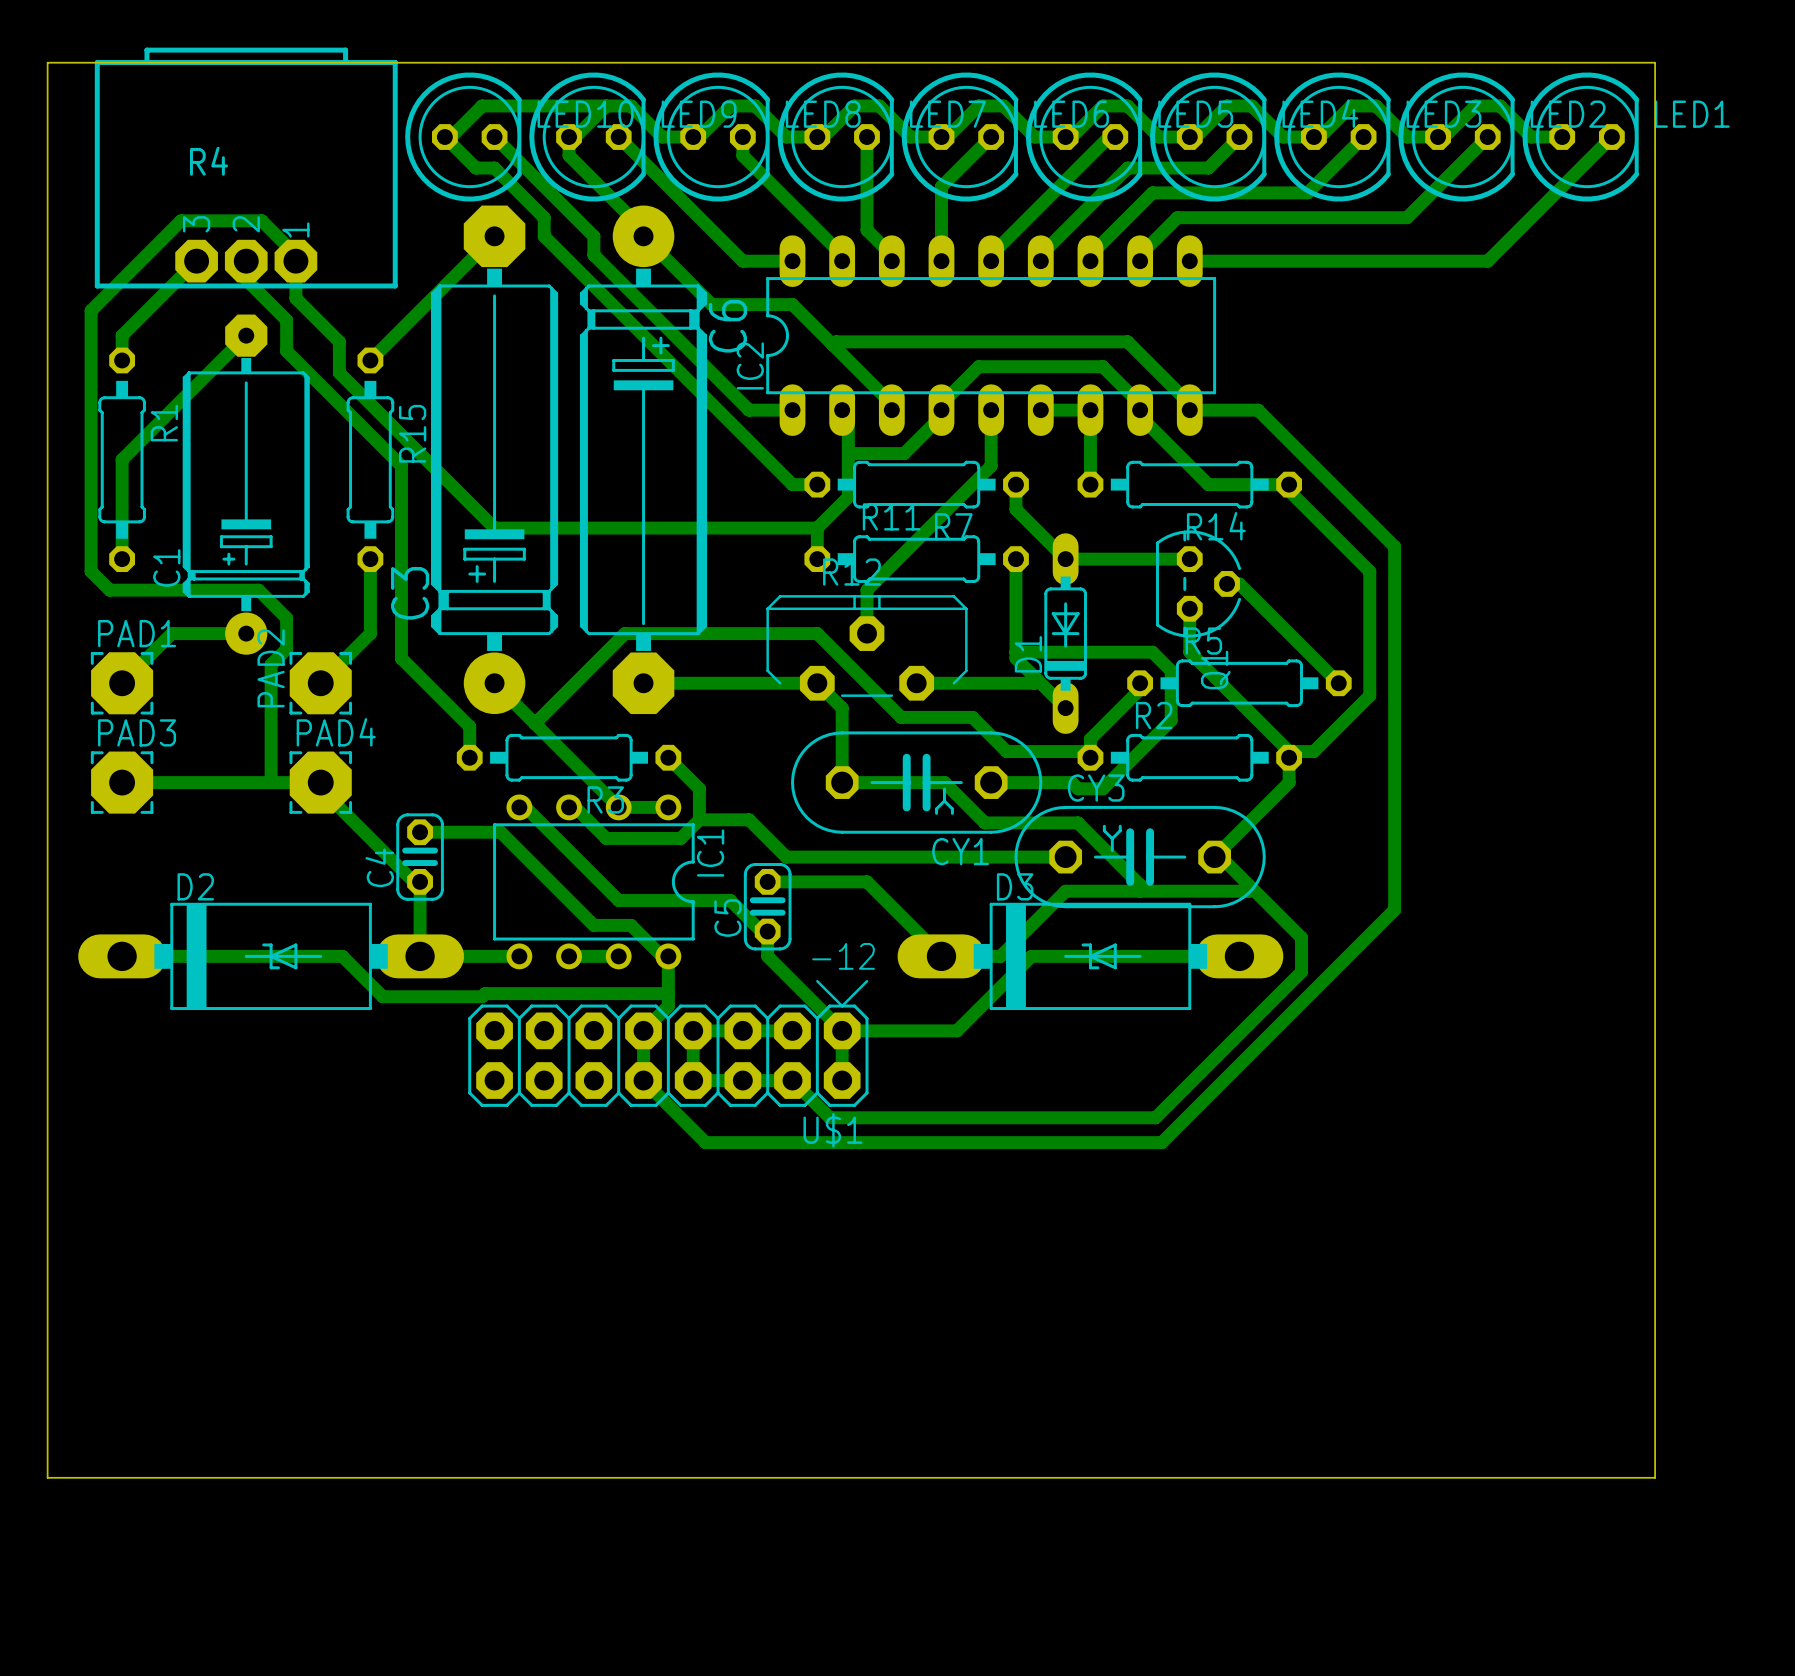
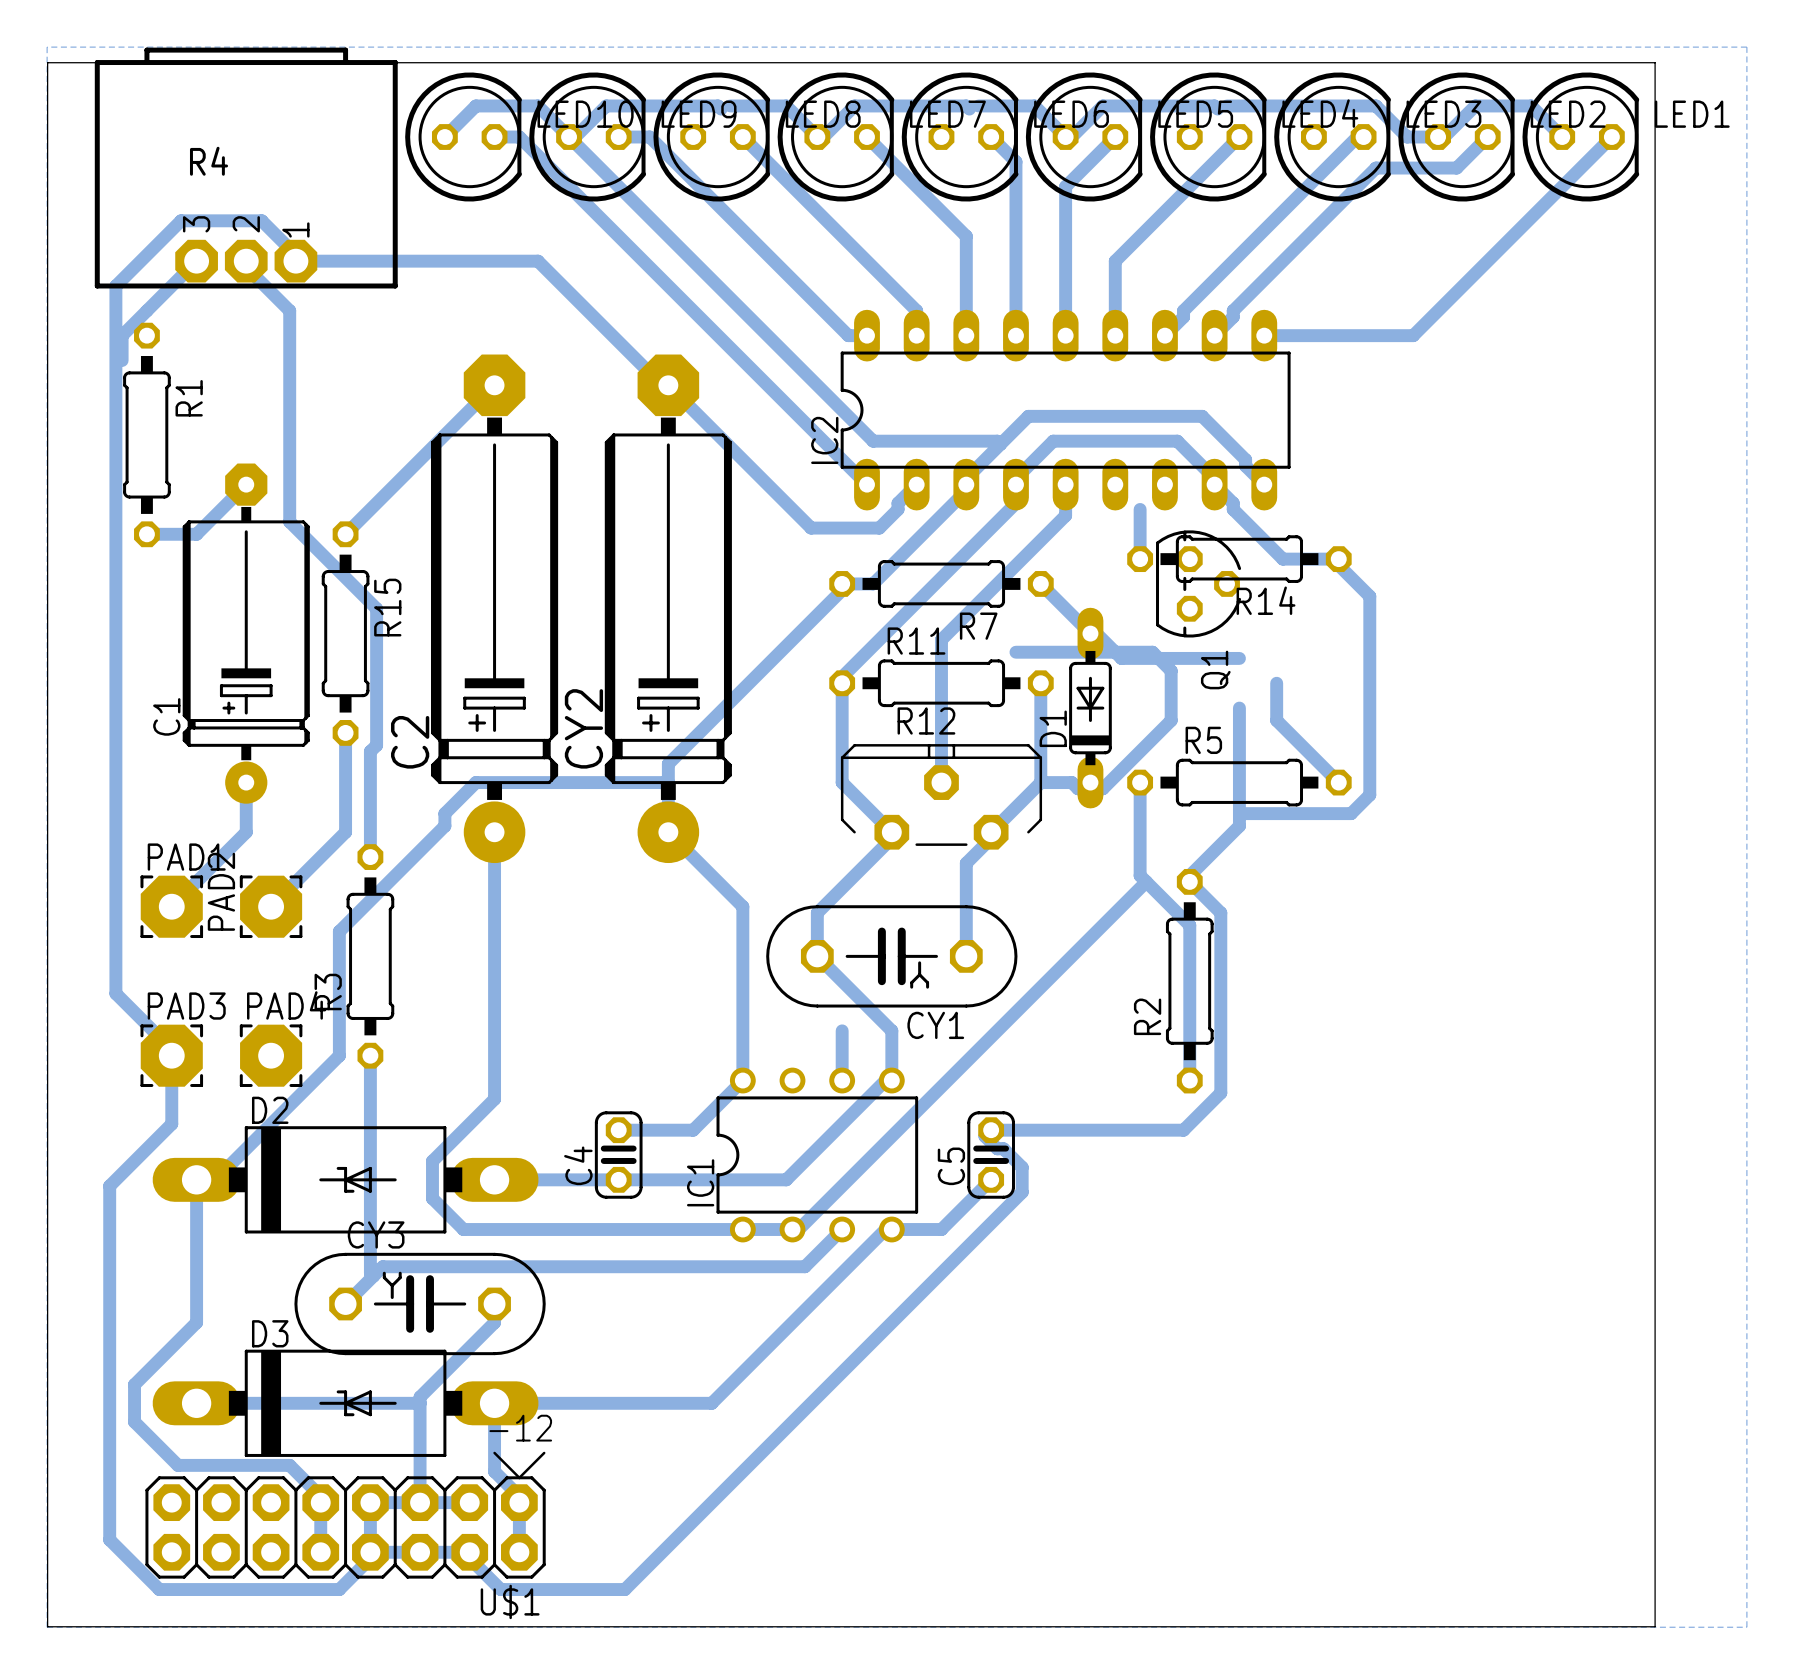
bottom zone outline: none -> (47, 47) (1746, 47) (1746, 1627) (47, 1627) (47, 47)
bottom track: (482, 105) (451, 137) (444, 137) (475, 168) (494, 168) (544, 217) (544, 236) (792, 484) (817, 484) -> (482, 105) (475, 105) (444, 137)
bottom track: (538, 105) (606, 105) -> (538, 105) (842, 410)
bottom track: (631, 105) (662, 137) (699, 137) (730, 105) -> (631, 105) (718, 105) (721, 109)
bottom track: (755, 105) (786, 137) (817, 137) -> (755, 105) (786, 105) (817, 137)
bottom track: (879, 105) (910, 137) (947, 137) (978, 105) -> (879, 105) (966, 105) (969, 109)
bottom track: (1003, 105) (1034, 137) (1065, 137) -> (1003, 105) (1034, 105) (1065, 137)
bottom track: (1127, 105) (1158, 137) (1195, 137) (1227, 105) -> (1127, 105) (1214, 105) (1217, 109)
bottom track: (1251, 105) (1282, 137) (1320, 137) (1351, 105) -> (1251, 105) (1351, 105)
bottom track: (1500, 105) (1531, 137) (1562, 137) -> (1500, 105) (1531, 105) (1562, 137)
bottom track: (494, 137) (593, 236) (593, 254) (749, 410) (792, 410) -> (494, 137) (519, 137) (866, 484)
bottom track: (569, 137) (569, 155) (643, 230) (643, 236) (711, 304) (792, 304) (891, 403) (891, 410) -> none
bottom track: (618, 137) (742, 261) (792, 261) -> (618, 137) (649, 137) (848, 335) (866, 335)
bottom track: (742, 137) (742, 155) (842, 254) (842, 261) -> (742, 137) (916, 310) (916, 335)
bottom track: (866, 137) (866, 230) (891, 254) (891, 261) -> (866, 137) (966, 236) (966, 335)
bottom track: (991, 137) (941, 186) (941, 261) -> (991, 137) (1015, 161) (1015, 335)
bottom track: (1115, 137) (1109, 137) (991, 254) (991, 261) -> (1115, 137) (1065, 186) (1065, 335)
bottom track: (1363, 137) (1307, 192) (1152, 192) (1090, 254) (1090, 261) -> (1363, 137) (1357, 137) (1183, 310) (1183, 317) (1164, 335)
bottom track: (1208, 168) (1127, 168) (1040, 254) (1040, 261) -> (1208, 168) (1115, 261) (1115, 335)
bottom track: (1456, 168) (1407, 217) (1177, 217) (1140, 254) (1140, 261) -> (1456, 168) (1376, 168) (1233, 310) (1233, 317) (1214, 335)
bottom track: (494, 236) (370, 360) -> none
bottom track: (295, 261) (295, 298) (339, 341) (339, 372) (494, 528) (811, 528) -> (295, 261) (538, 261) (662, 385) (668, 385) (811, 528)
bottom track: (1189, 261) (1487, 261) -> (1264, 335) (1413, 335) (1487, 261)
bottom track: (246, 267) (246, 279) (286, 320) (286, 351) (401, 466) (401, 658) (469, 726) (469, 757) -> (246, 267) (289, 310) (289, 521) (376, 608) (376, 745) (370, 751) (370, 857)
bottom track: (115, 285) (91, 310) (91, 571) (109, 590) (258, 590) (286, 618) (286, 649) (271, 664) (271, 782) -> (115, 285) (115, 993) (171, 1049) (171, 1123) (109, 1186) (109, 1539) (159, 1589) (339, 1589) (370, 1558) (370, 1502) (469, 1502)
bottom track: (246, 335) (122, 459) (122, 559) -> none
IC2 position: (991, 335) -> (1065, 410)
bottom track: (832, 344) (835, 341) (1127, 341) (1189, 403) (1189, 410) (1258, 410) (1394, 546) (1394, 909) (1161, 1142) (705, 1142) (643, 1080) (643, 1030) (668, 1006) (668, 956) (662, 956) (631, 925) (593, 925) (500, 832) (420, 832) -> none
bottom track: none -> (494, 385) (345, 534)
bottom track: (991, 410) (991, 466) (966, 490) -> (1264, 484) (1245, 466) (1245, 459) (1202, 416) (1028, 416) (966, 478) (966, 490)
bottom track: (1040, 410) (1090, 410) (1090, 484) -> none
bottom track: (848, 416) (848, 497) (817, 528) (817, 559) -> (848, 416) (873, 441) (997, 441) (1000, 444)
bottom track: (848, 453) (904, 453) (941, 416) (941, 403) (978, 366) (1102, 366) (1140, 403) (1140, 416) (1208, 484) (1289, 484) (1289, 490) (1369, 571) (1369, 596) -> (1015, 484) (1015, 478) (1053, 441) (1177, 441) (1214, 478) (1214, 484) (1233, 503) (1233, 509) (1282, 559) (1338, 559) (1338, 565) (1369, 596)
R1 position: (122, 459) -> (146, 434)
R15 position: (370, 459) -> (345, 633)
C3: (494, 459) -> none
C6: (643, 459) -> none
bottom track: none -> (246, 484) (196, 534) (146, 534)
C1 position: (246, 484) -> (246, 633)
bottom track: none -> (916, 484) (898, 503) (898, 509) (879, 528) (817, 528)
R7 position: (916, 484) -> (941, 583)
bottom track: none -> (1065, 484) (1065, 515) (941, 639) (941, 782)
R14 position: (1189, 484) -> (1239, 559)
bottom track: (1015, 503) (1015, 509) (1065, 559) (1189, 559) -> (1015, 503) (842, 677) (842, 708)
bottom track: none -> (1140, 509) (1140, 559)
bottom track: (370, 559) (370, 633) (320, 683) -> none
R11 position: (916, 559) -> (941, 683)
bottom track: (1015, 559) (1015, 658) (1065, 708) -> none
bottom track: (873, 583) (866, 590) (866, 633) -> (873, 583) (842, 583) (842, 590) (668, 763) (668, 832) (742, 906) (742, 1080) (693, 1130) (618, 1130)
bottom track: none -> (1040, 583) (1090, 633) (1096, 633) (1121, 658) (1239, 658)
bottom track: (1227, 583) (1239, 583) (1338, 683) -> none
C2: none -> (494, 608)
CY2: none -> (668, 608)
bottom track: (1189, 608) (1189, 652) (1289, 751) (1289, 782) (1214, 857) (1220, 857) (1301, 937) (1301, 971) (1155, 1117) (829, 1117) (792, 1080) (693, 1080) (693, 1030) (792, 1030) -> none
bottom track: (246, 633) (171, 633) (122, 683) -> none
D1 position: (1065, 633) -> (1090, 708)
R12 position: (866, 647) -> (941, 796)
bottom track: (1037, 680) (1034, 683) (916, 683) -> none
PAD1 position: (122, 683) -> (171, 906)
PAD2 position: (320, 683) -> (271, 906)
bottom track: (494, 683) (618, 807) (668, 807) -> none
bottom track: (643, 683) (817, 683) (842, 708) -> none
bottom track: none -> (1040, 683) (1040, 782) (991, 832) (991, 838) (966, 863) (966, 956)
bottom track: (1140, 683) (1140, 689) (1090, 739) (1090, 757) (1084, 751) (1006, 751) (972, 717) (901, 717) (817, 633) (624, 633) (534, 723) -> none
R5 position: (1239, 683) -> (1239, 782)
bottom track: none -> (1276, 683) (1276, 720) (1338, 782)
bottom track: (1369, 695) (1313, 751) (1295, 751) (1289, 757) -> (1369, 695) (1369, 794) (1351, 813) (1239, 813)
bottom track: none -> (1239, 708) (1239, 826) (1189, 875) (1189, 881) (1220, 912) (1220, 1092) (1183, 1130) (991, 1130) (984, 1136) (997, 1148) (1003, 1148) (1022, 1167) (1022, 1192) (624, 1589) (500, 1589) (469, 1558) (469, 1552) (370, 1552)
R2 name position: R2 (1154, 715) -> R2 (1147, 1016)
bottom track: none -> (345, 732) (345, 832) (271, 906)
R3 rotation: 0° (569, 757) -> 90° clockwise (370, 956)
R3 position: (569, 757) -> (370, 956)
bottom track: (668, 757) (699, 788) (699, 819) -> none
R2 rotation: 0° (1189, 757) -> 90° clockwise (1189, 981)
R2 position: (1189, 757) -> (1189, 981)
bottom track: (122, 782) (320, 782) (320, 788) (413, 881) (420, 881) (420, 956) (519, 956) -> none
PAD3 position: (122, 782) -> (171, 1055)
bottom track: none -> (246, 782) (246, 832) (171, 906)
PAD4 position: (320, 782) -> (271, 1055)
bottom track: none -> (668, 782) (475, 782) (444, 813) (444, 826) (339, 931) (339, 1055) (215, 1179) (196, 1179) (196, 1322) (134, 1384) (134, 1421) (177, 1465) (289, 1465) (320, 1496) (320, 1552)
bottom track: (842, 782) (944, 782) (984, 822) (1078, 822) (1140, 885) (1140, 891) -> (842, 782) (891, 832) (891, 838) (817, 912) (817, 956) (891, 1030) (891, 1080) (885, 1080) (786, 1179) (494, 1179)
CY1 position: (916, 782) -> (891, 956)
bottom track: (991, 782) (1040, 782) -> none
bottom track: none -> (1140, 782) (1140, 875) (1189, 925) (1189, 1080)
bottom track: (519, 807) (525, 807) (618, 900) (730, 900) (761, 931) (767, 931) (767, 956) (842, 1030) (957, 1030) (1031, 956) (1239, 956) -> none
bottom track: (569, 807) (575, 807) (606, 838) (680, 838) (699, 819) -> none
bottom track: (699, 819) (749, 819) (786, 857) (1065, 857) -> none
bottom track: none -> (494, 832) (494, 1099) (432, 1161) (432, 1198) (463, 1229) (798, 1229) (1146, 881)
C4 position: (420, 857) -> (618, 1155)
CY3 position: (1140, 857) -> (420, 1303)
IC1 rotation: 0° (593, 881) -> 180° (817, 1155)
IC1 position: (593, 881) -> (817, 1155)
bottom track: (767, 881) (866, 881) (941, 956) (1000, 956) (1065, 891) (1248, 891) (1251, 888) -> none
C5 position: (767, 906) -> (991, 1155)
bottom track: (122, 956) (342, 956) (382, 996) (482, 996) (485, 993) (668, 993) -> none
D2 position: (271, 956) -> (345, 1179)
bottom track: (569, 956) (618, 956) -> none
D3 position: (1090, 956) -> (345, 1403)
U$1 position: (668, 1043) -> (345, 1515)
bottom track: none -> (370, 1055) (370, 1272) (373, 1276)
bottom track: none -> (991, 1179) (941, 1229) (885, 1229) (711, 1403) (494, 1403) (494, 1471) (519, 1496) (519, 1552)
bottom track: none -> (842, 1229) (804, 1266) (382, 1266) (345, 1303)
bottom track: none -> (494, 1303) (494, 1322) (420, 1397) (420, 1502)
bottom track: none -> (196, 1403) (420, 1403)
board edge: (47, 1477) (1655, 1477) -> (47, 1477) (47, 1626) (1655, 1626) (1655, 1477)

